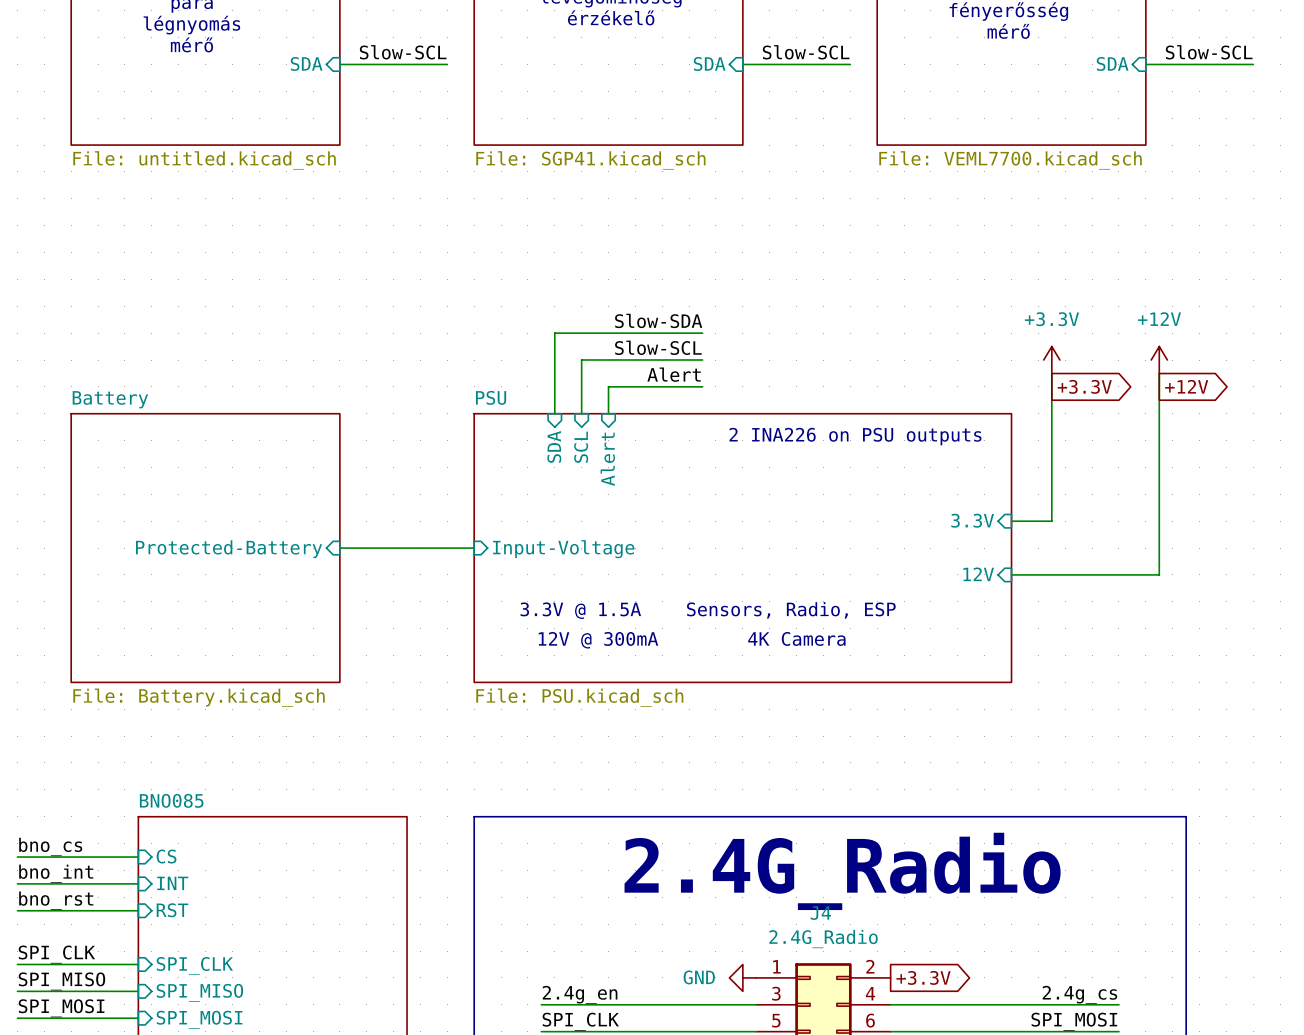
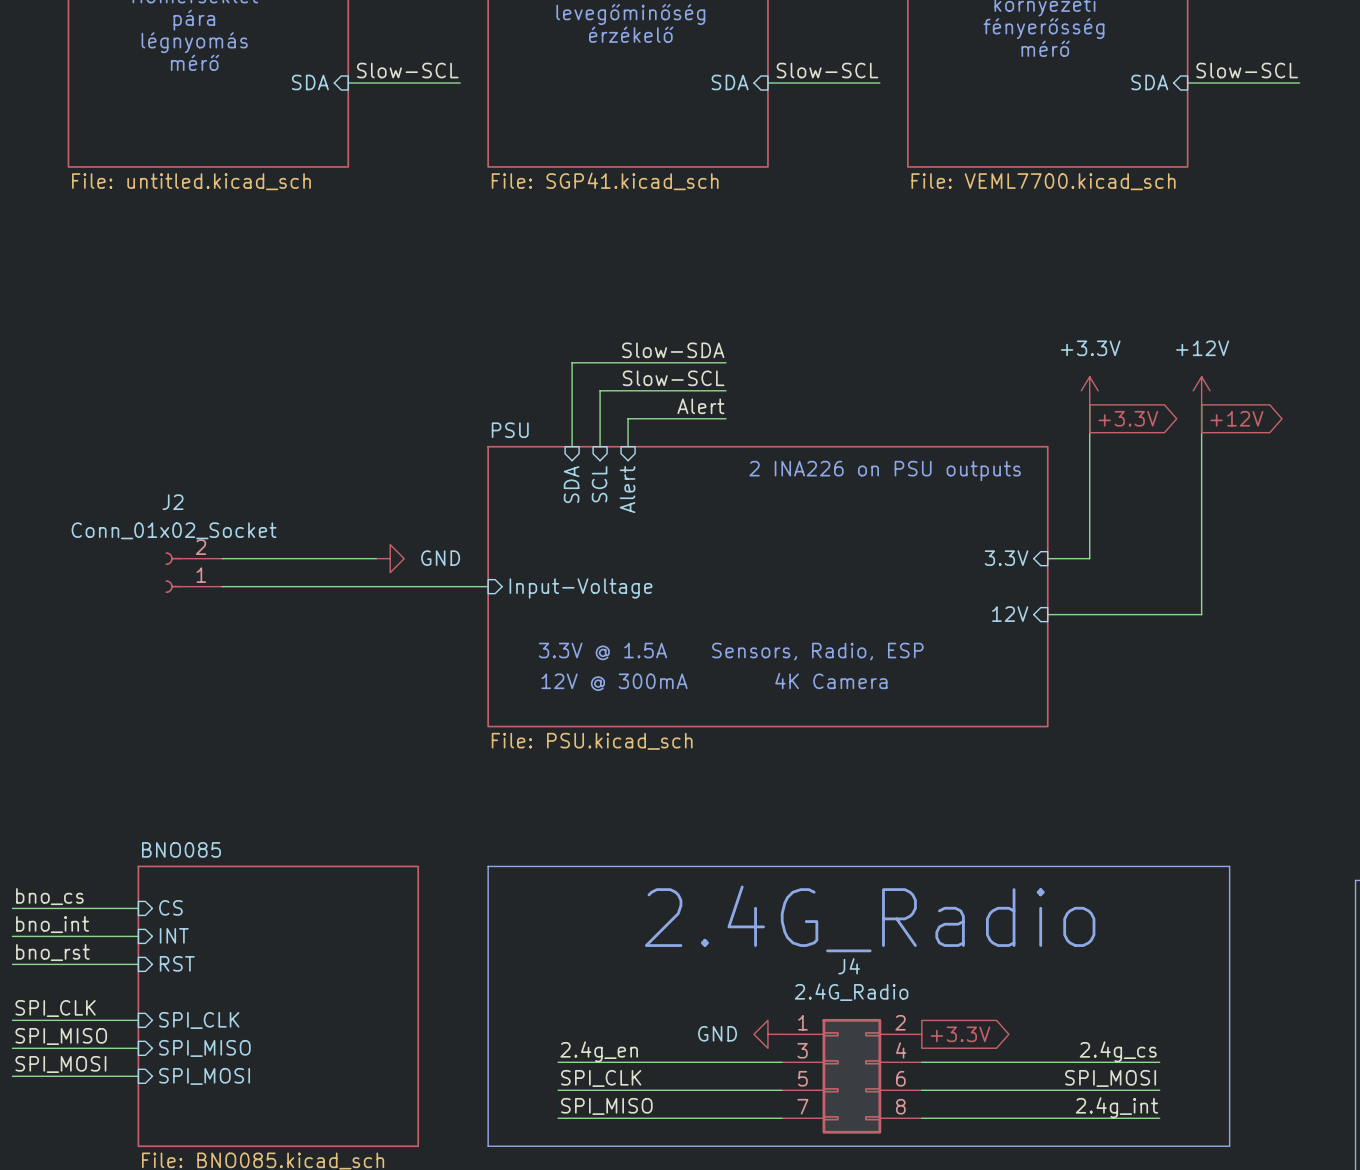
wire: none -> (222, 558) (376, 558)
power symbol: none -> GND (390, 558)
J2: none -> Conn_01x02_Socket (193, 572)
sheet Battery: File: Battery.kicad_sch (205, 548) -> none
wire: none -> (222, 586) (348, 586)
sheet pin: Protected-Battery (229, 549) -> none

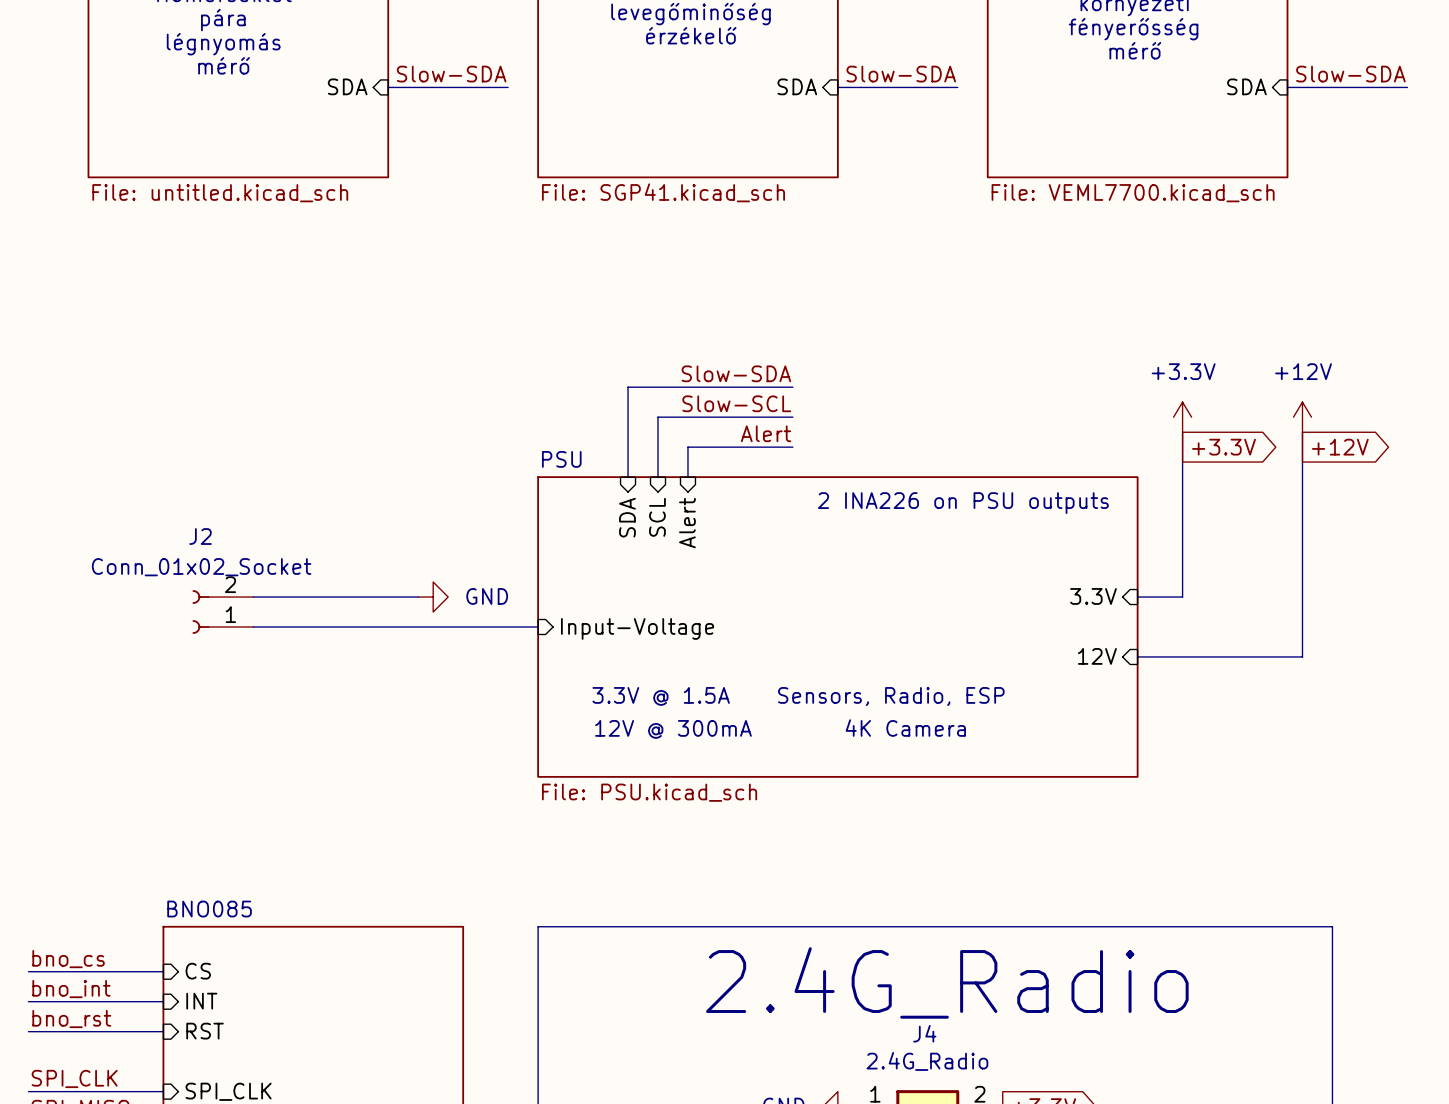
label: Slow-SCL (407, 70) -> Slow-SDA (451, 74)
label: Slow-SCL (827, 70) -> Slow-SDA (901, 74)
label: Slow-SCL (1247, 70) -> Slow-SDA (1350, 74)

